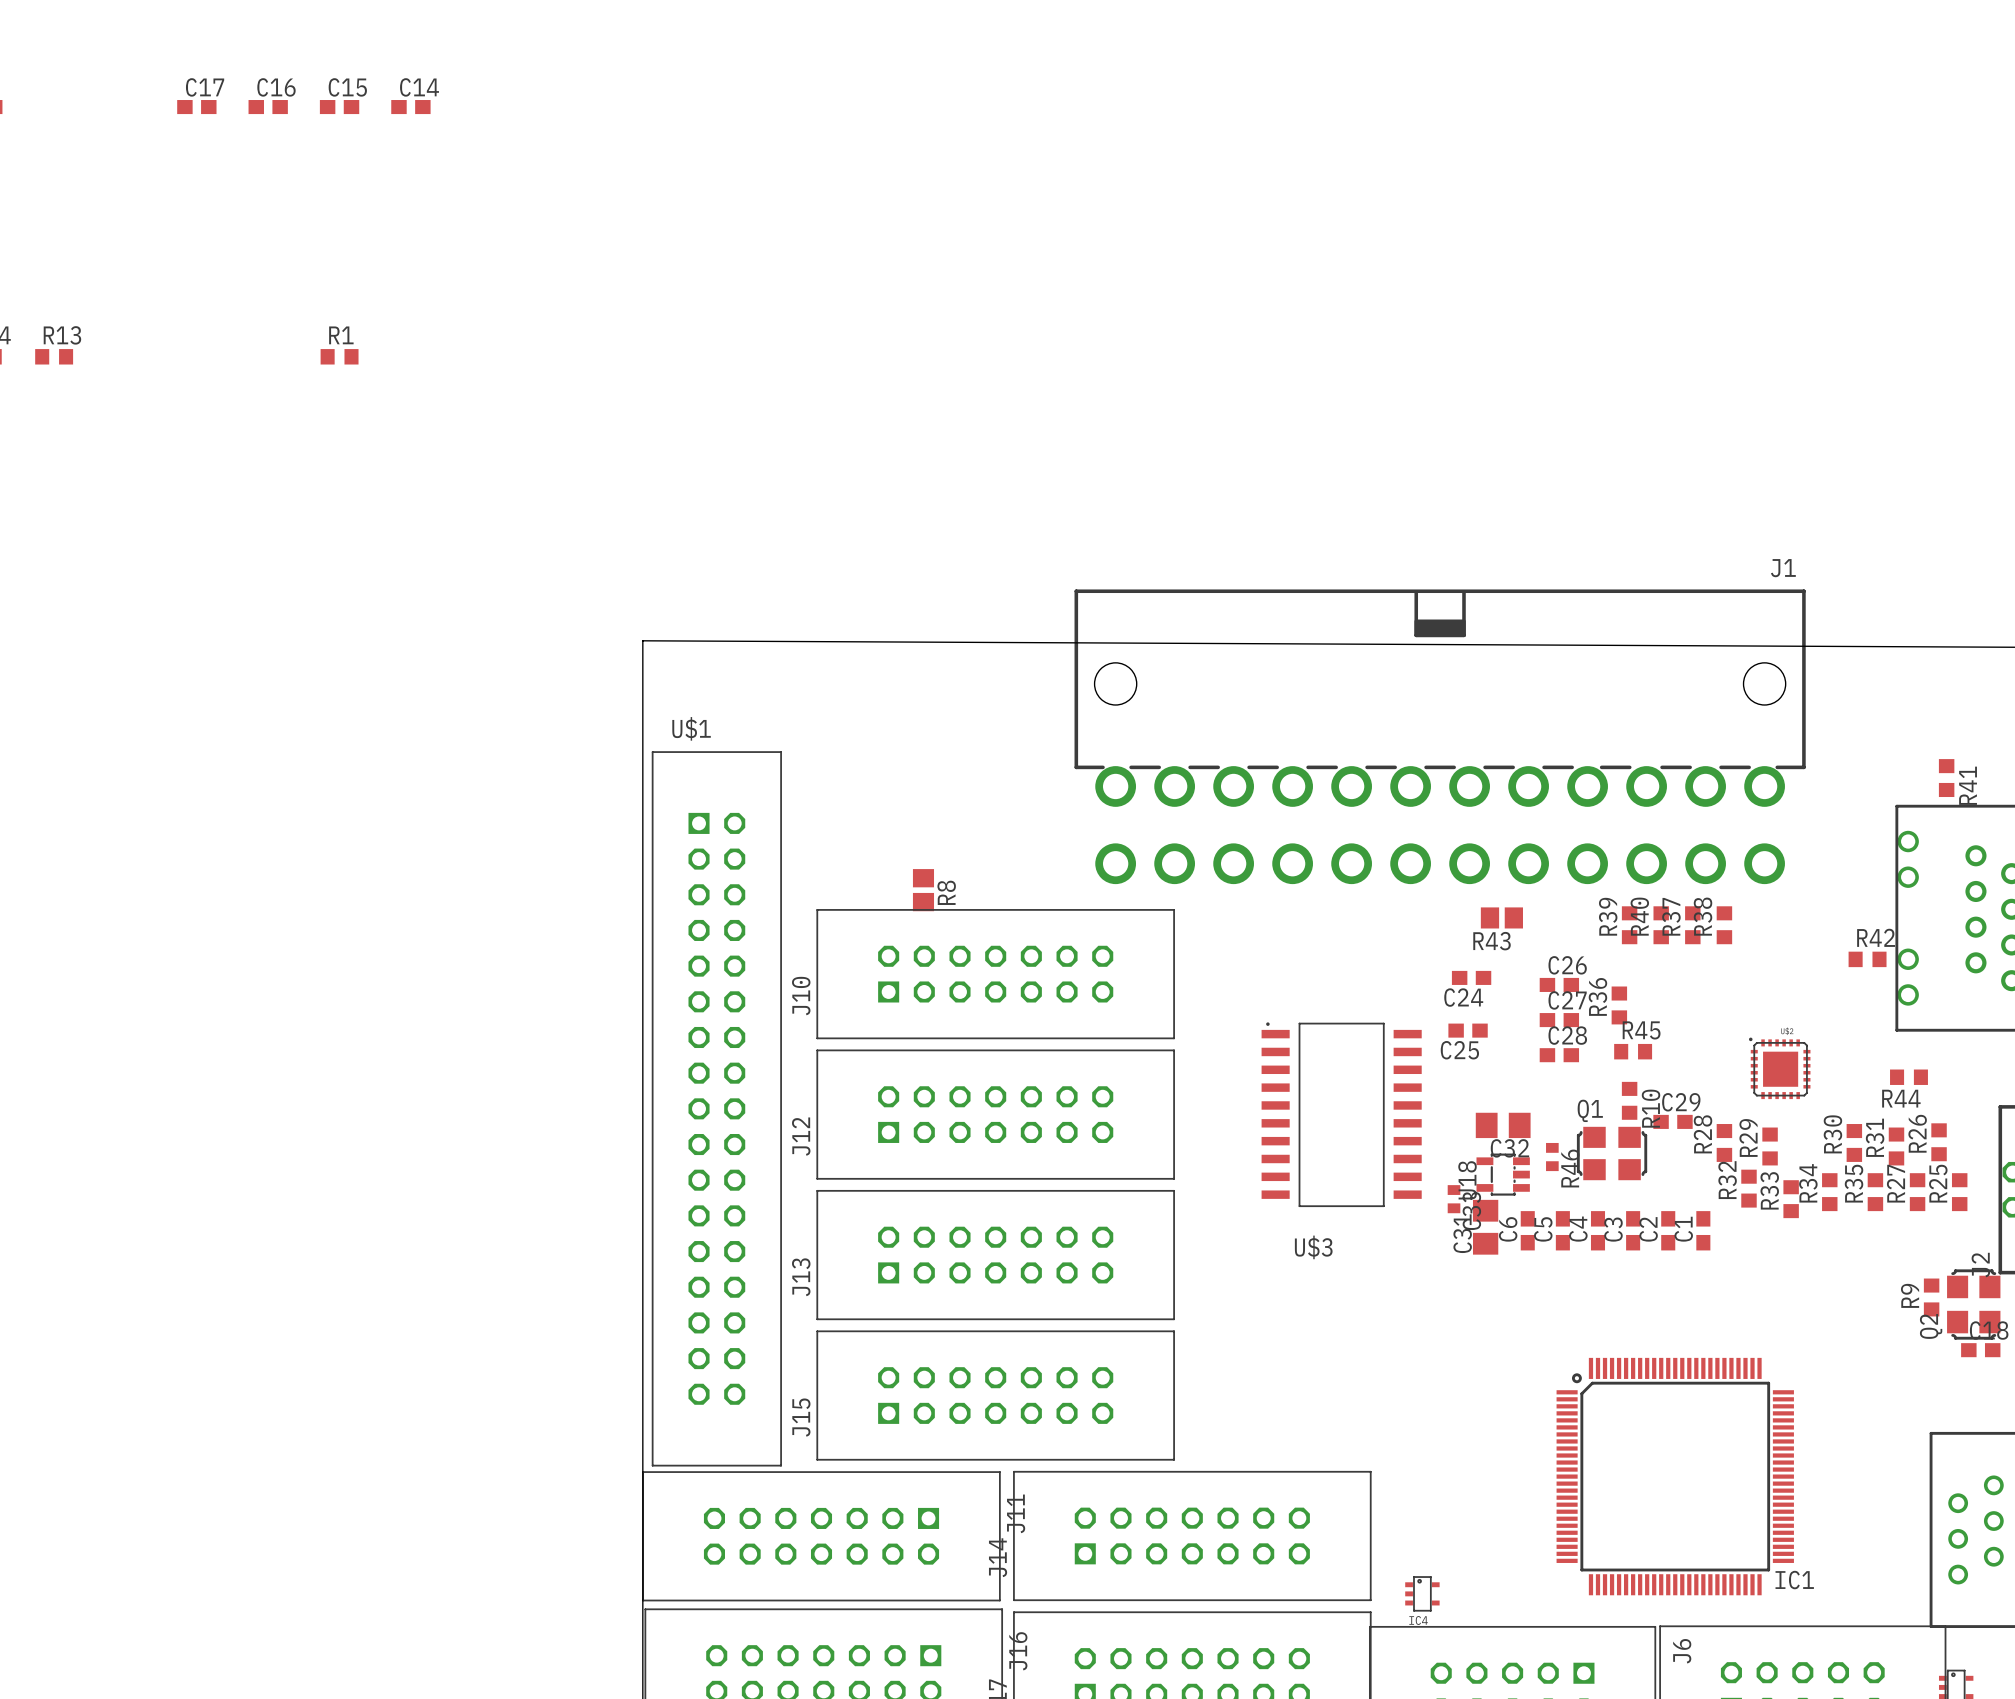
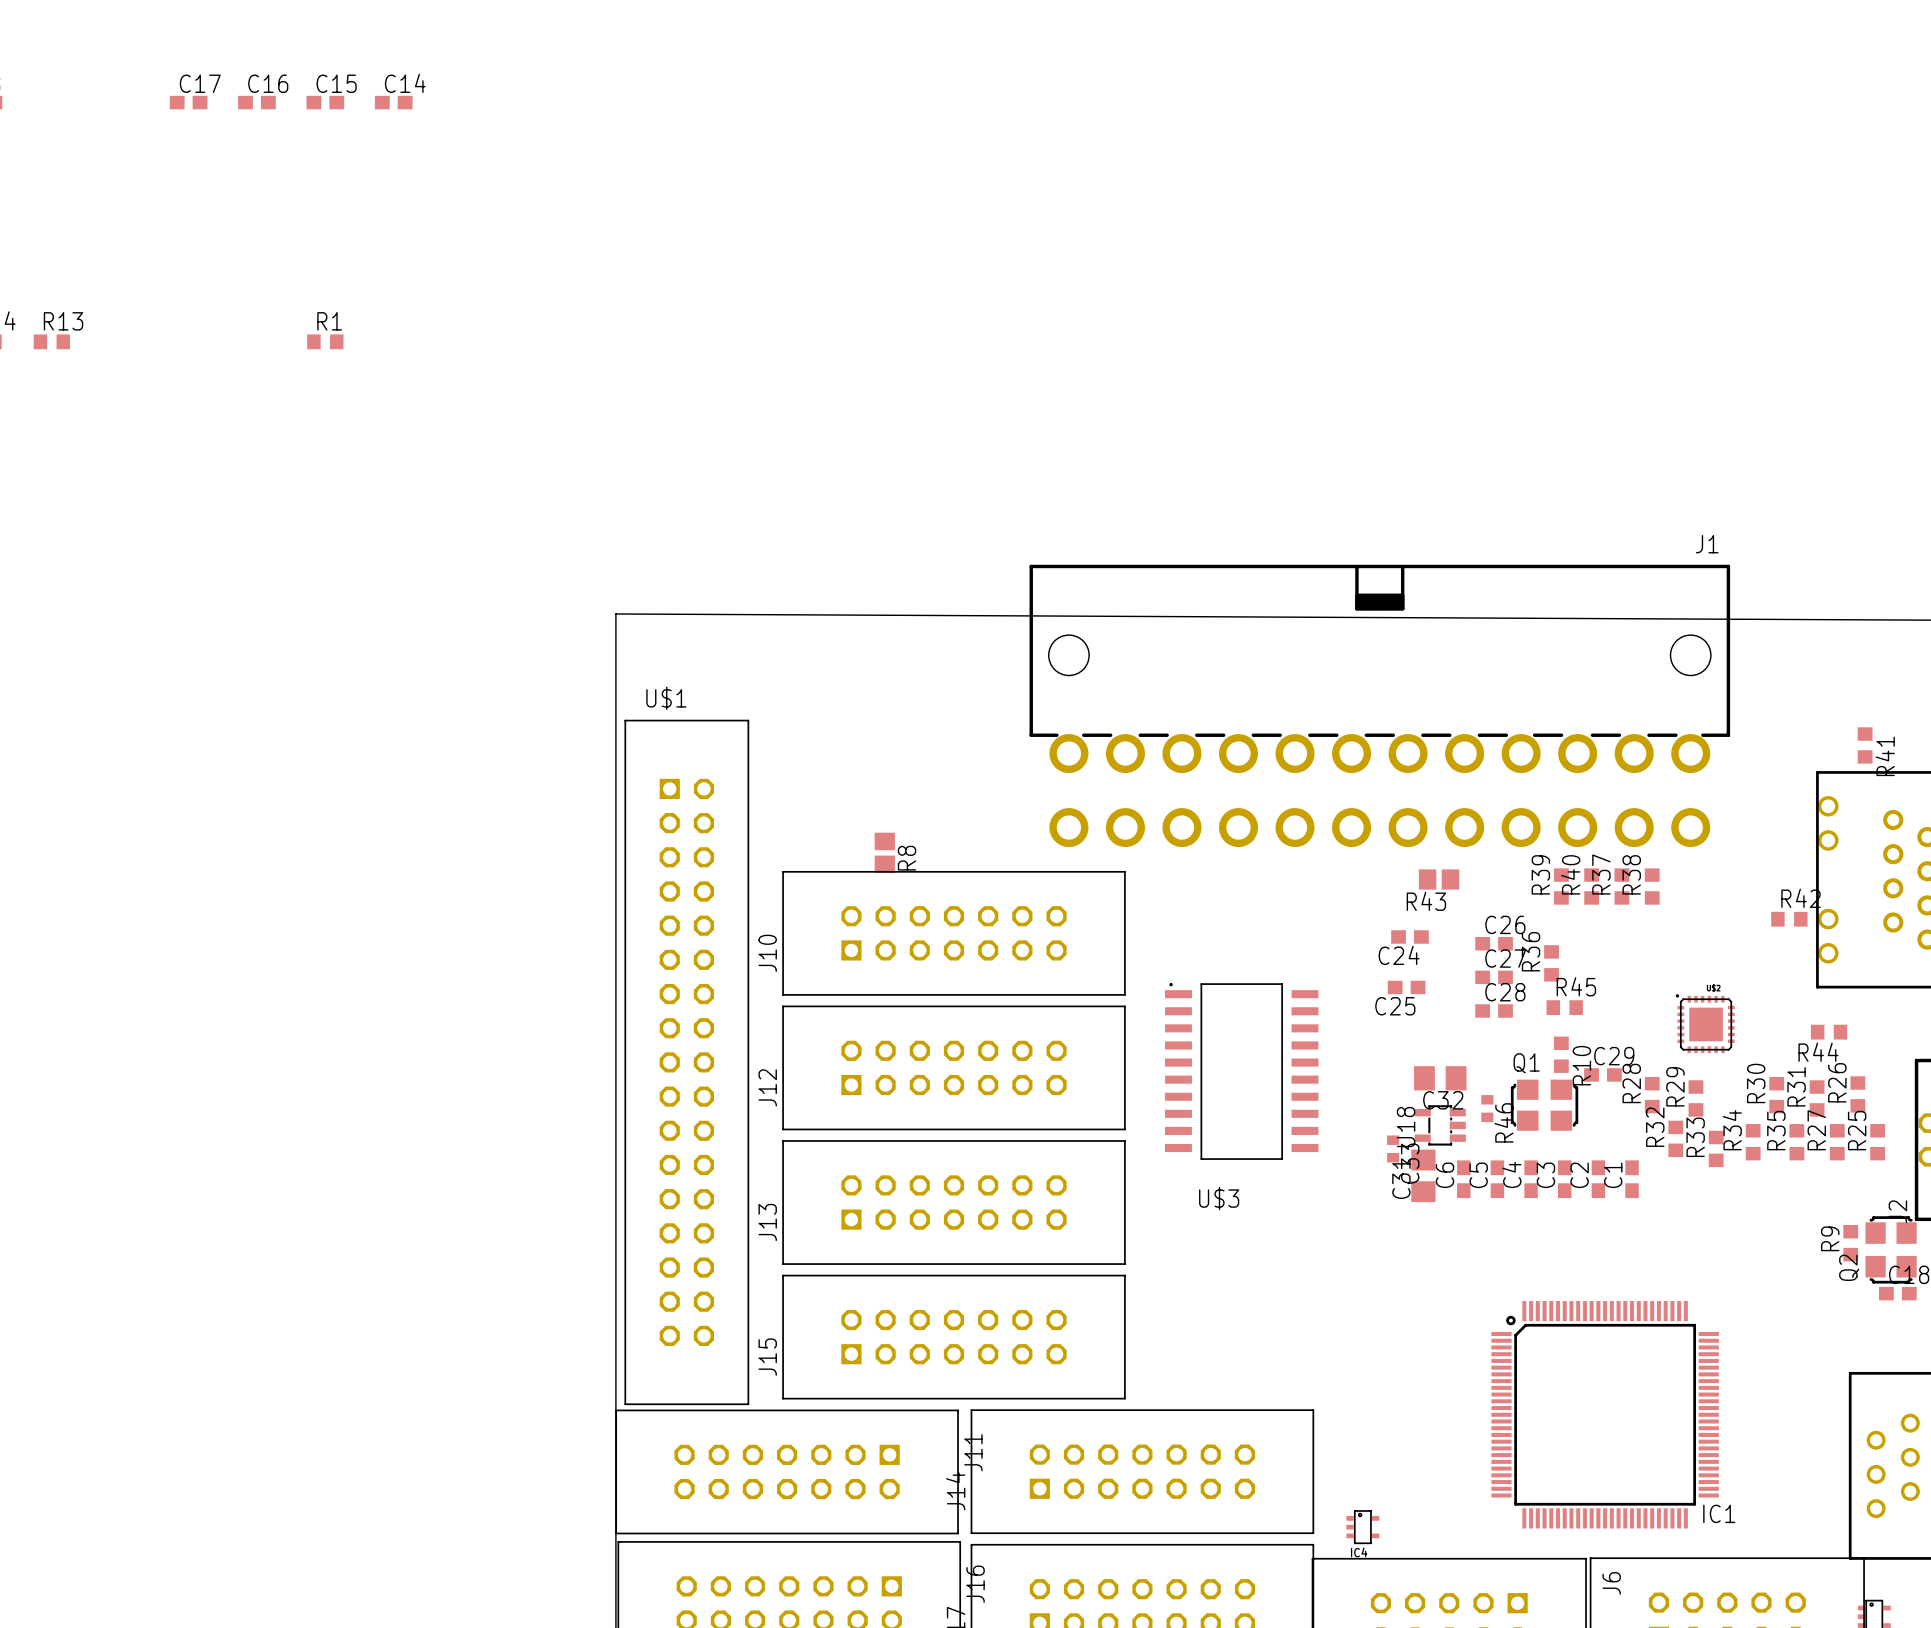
U$3 position: (1341, 1114) -> (1241, 1071)

